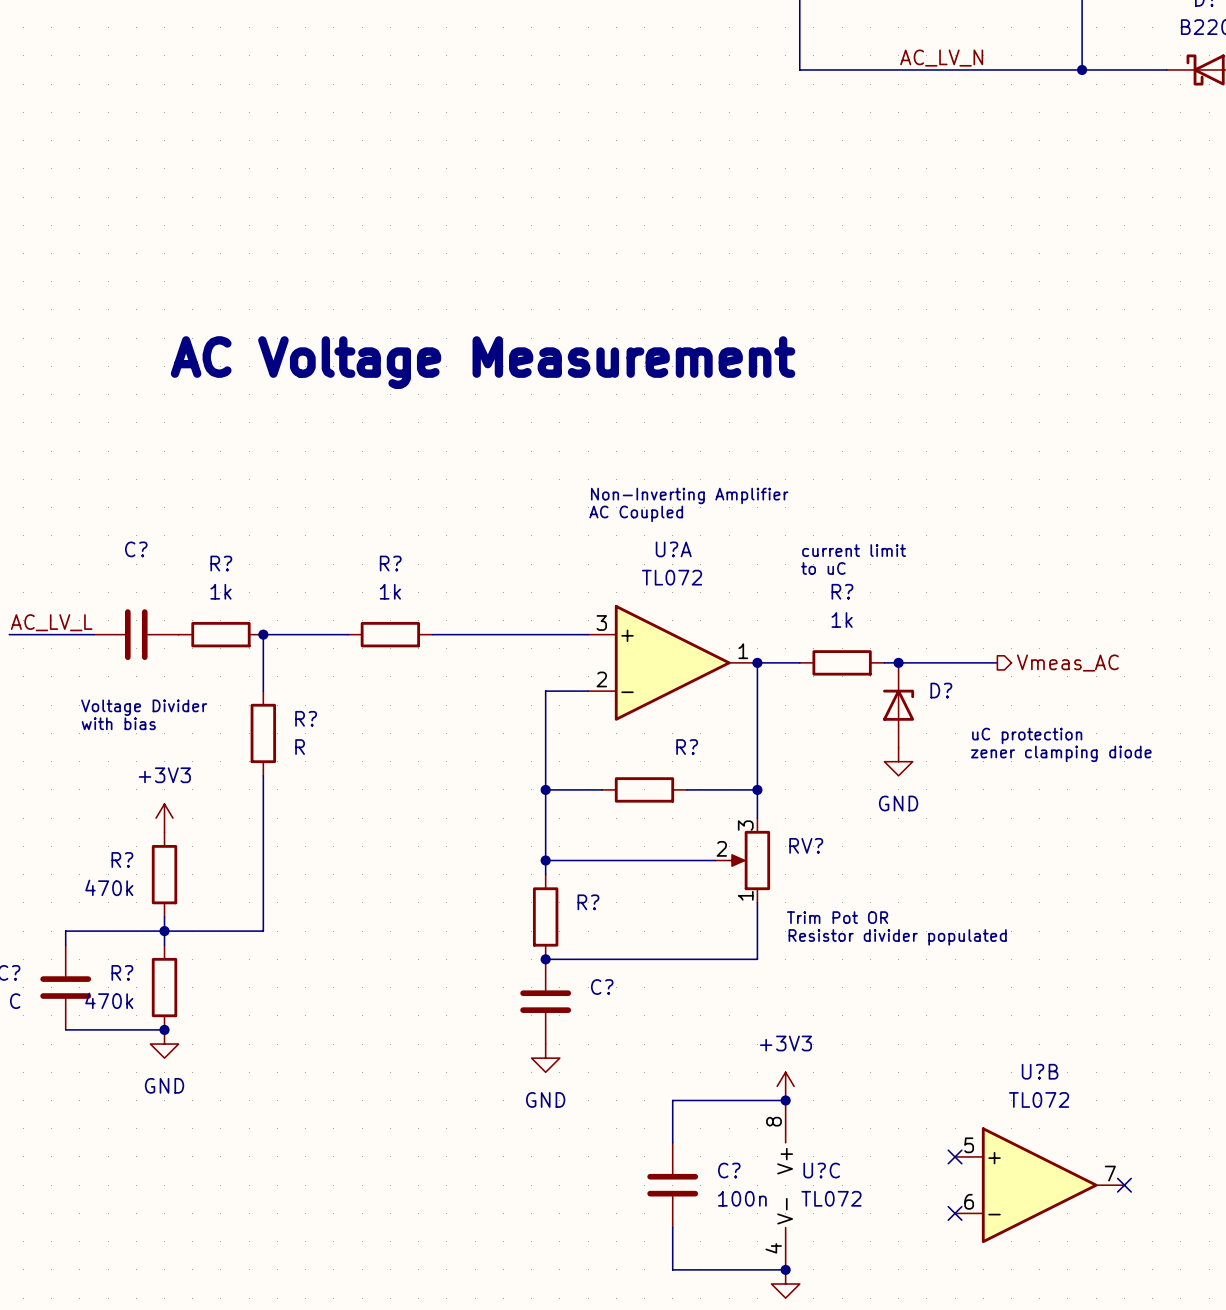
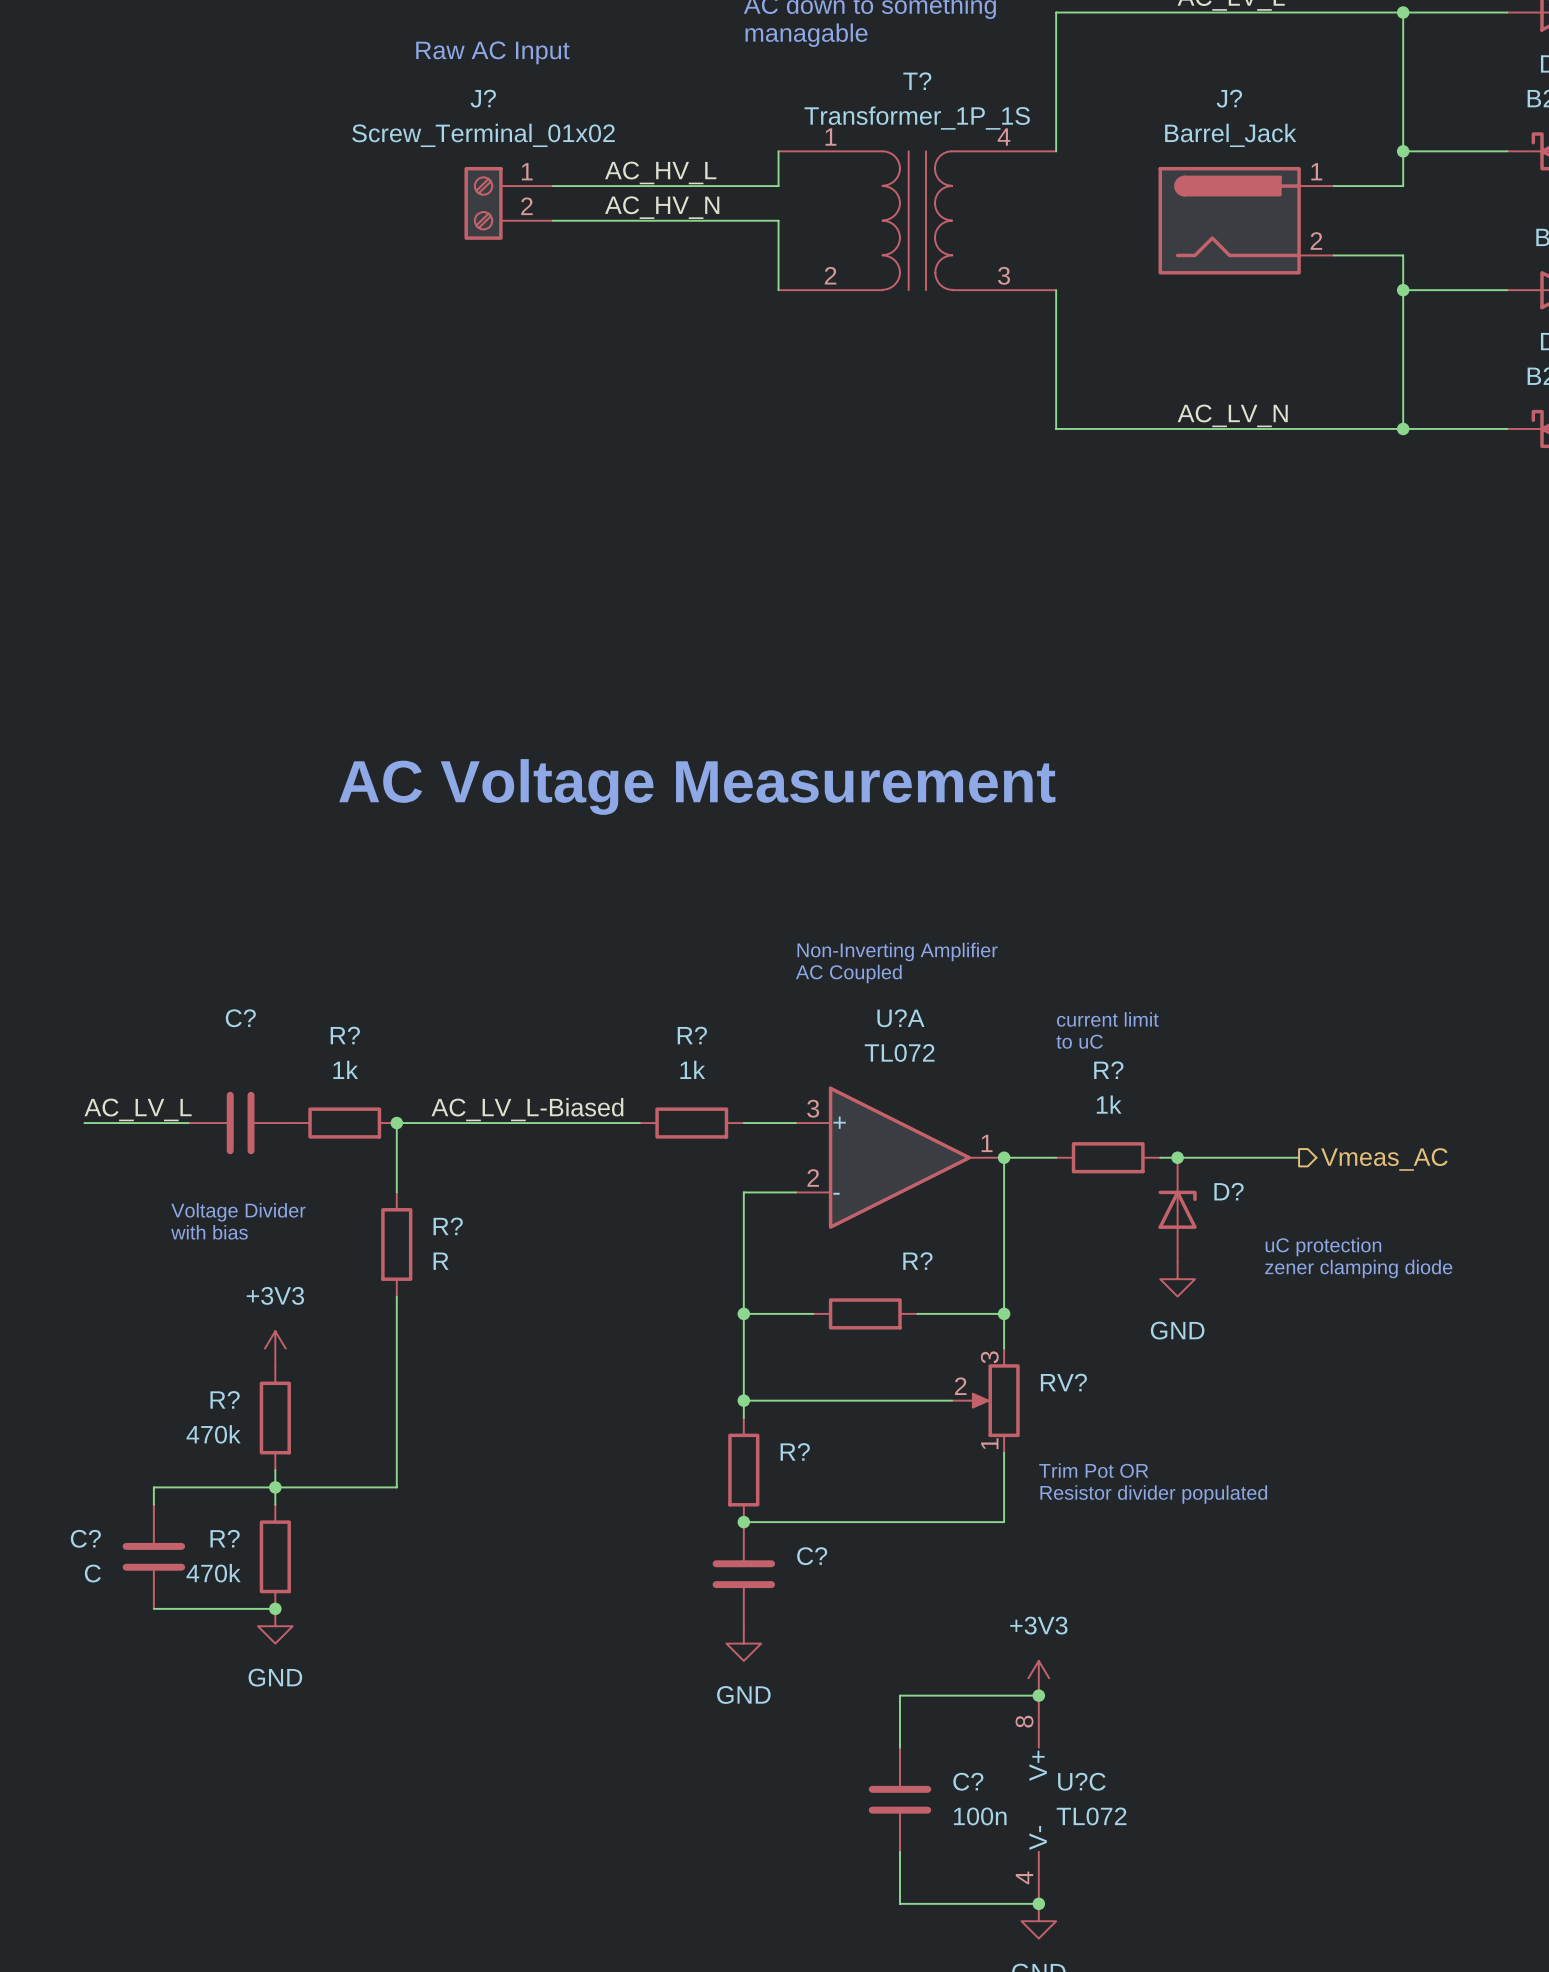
label: none -> AC_LV_L-Biased (527, 1109)
R? position: (390, 634) -> (691, 1123)
wire: (460, 634) (545, 634) -> (500, 1123) (605, 1123)
no-connect mark: (955, 1156) -> none
U?B: TL072 (1039, 1185) -> none
no-connect mark: (1124, 1185) -> none
no-connect mark: (955, 1213) -> none

